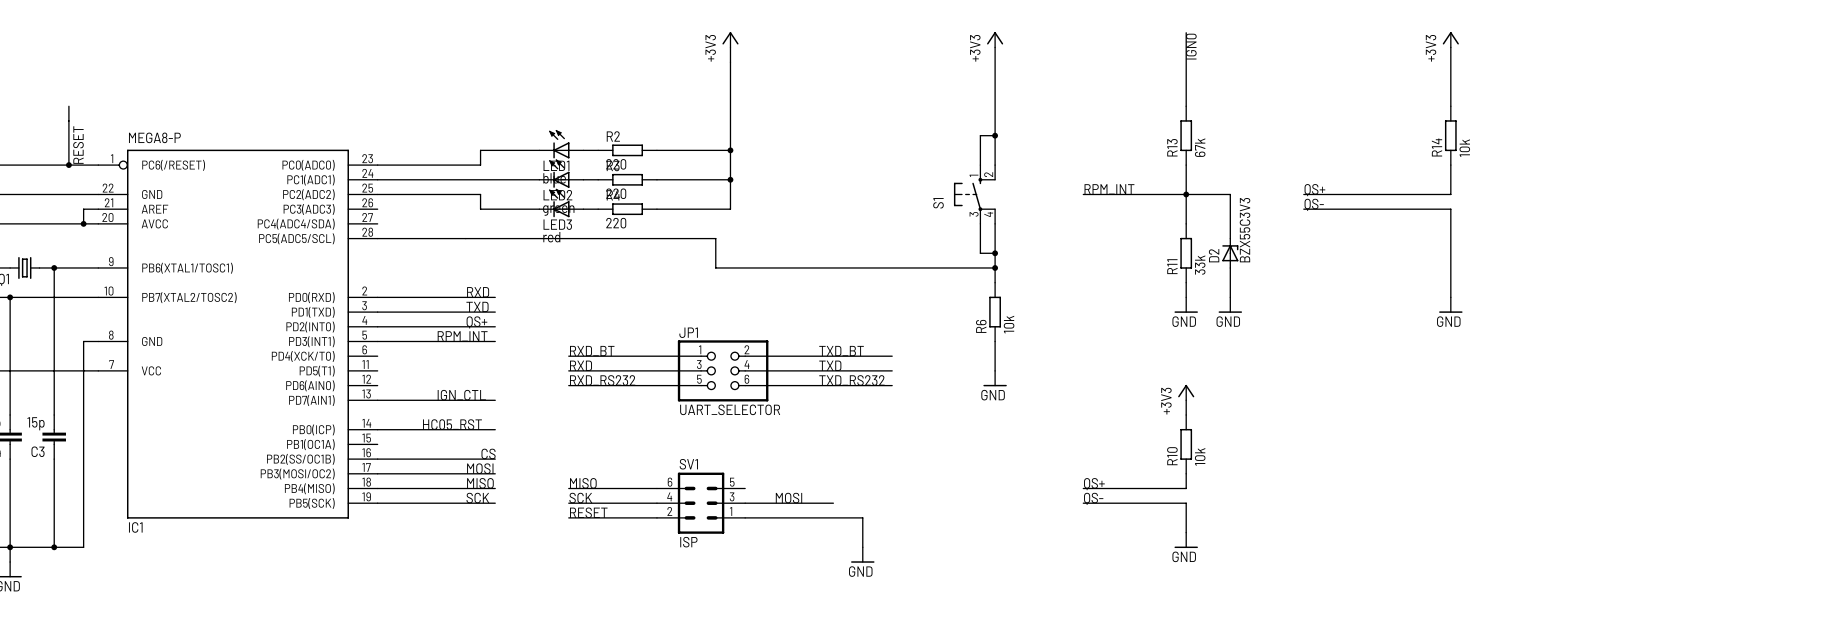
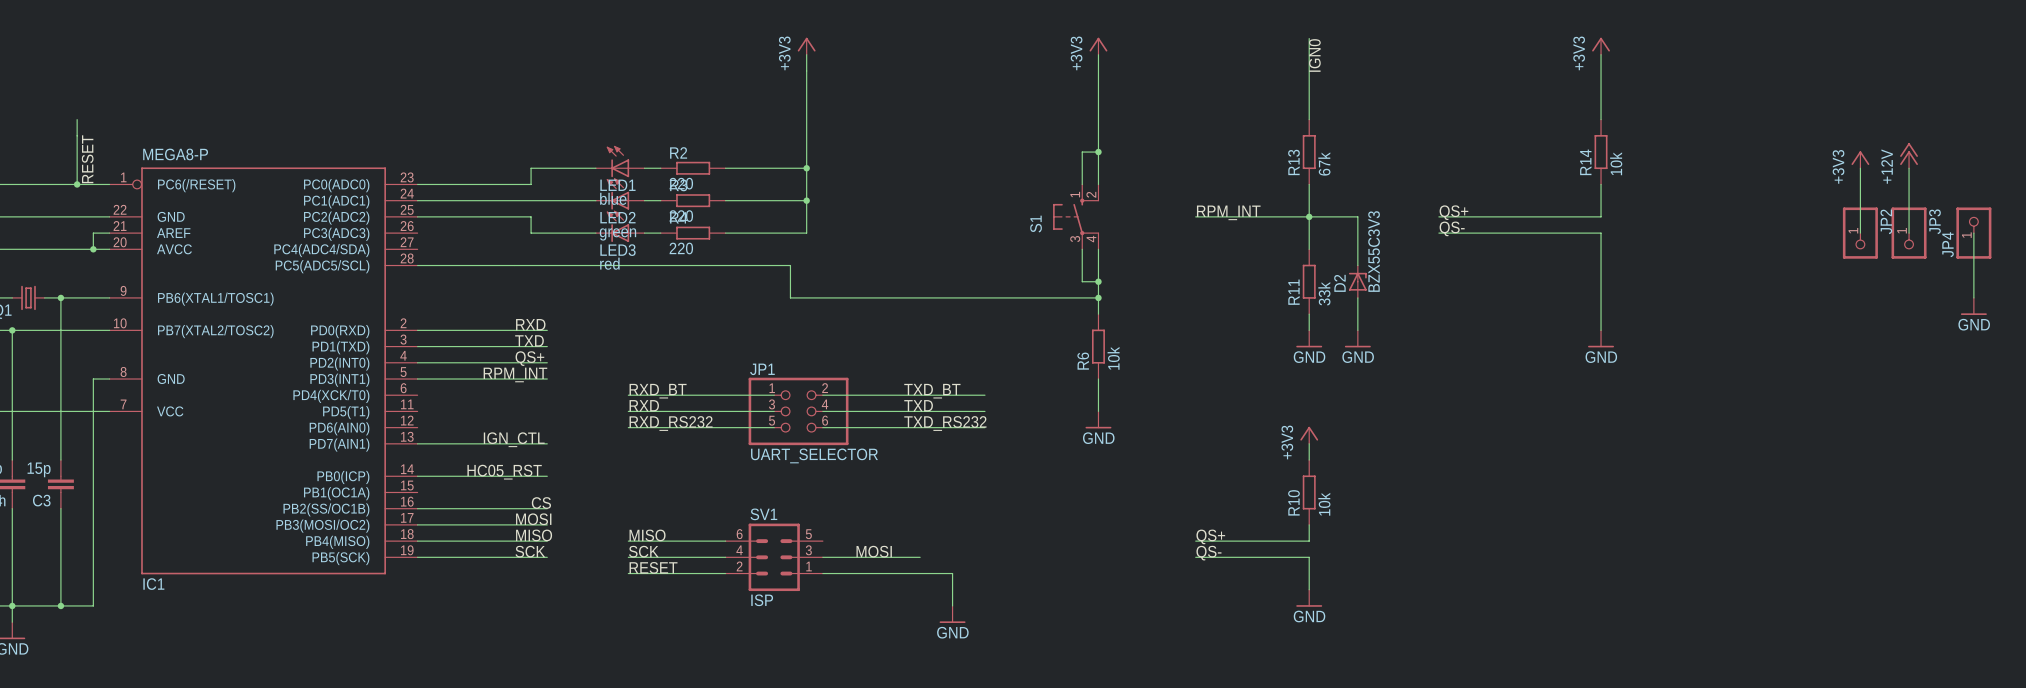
power symbol: none -> +12V (1909, 155)
power symbol: none -> +3V3 (1860, 159)
wire: none -> (1860, 168) (1860, 233)
wire: none -> (1909, 168) (1909, 233)
JP2: none -> (1860, 233)
JP3: none -> (1909, 233)
wire: none -> (1973, 233) (1973, 297)
JP4: none -> (1973, 233)
power symbol: none -> GND (1973, 306)

